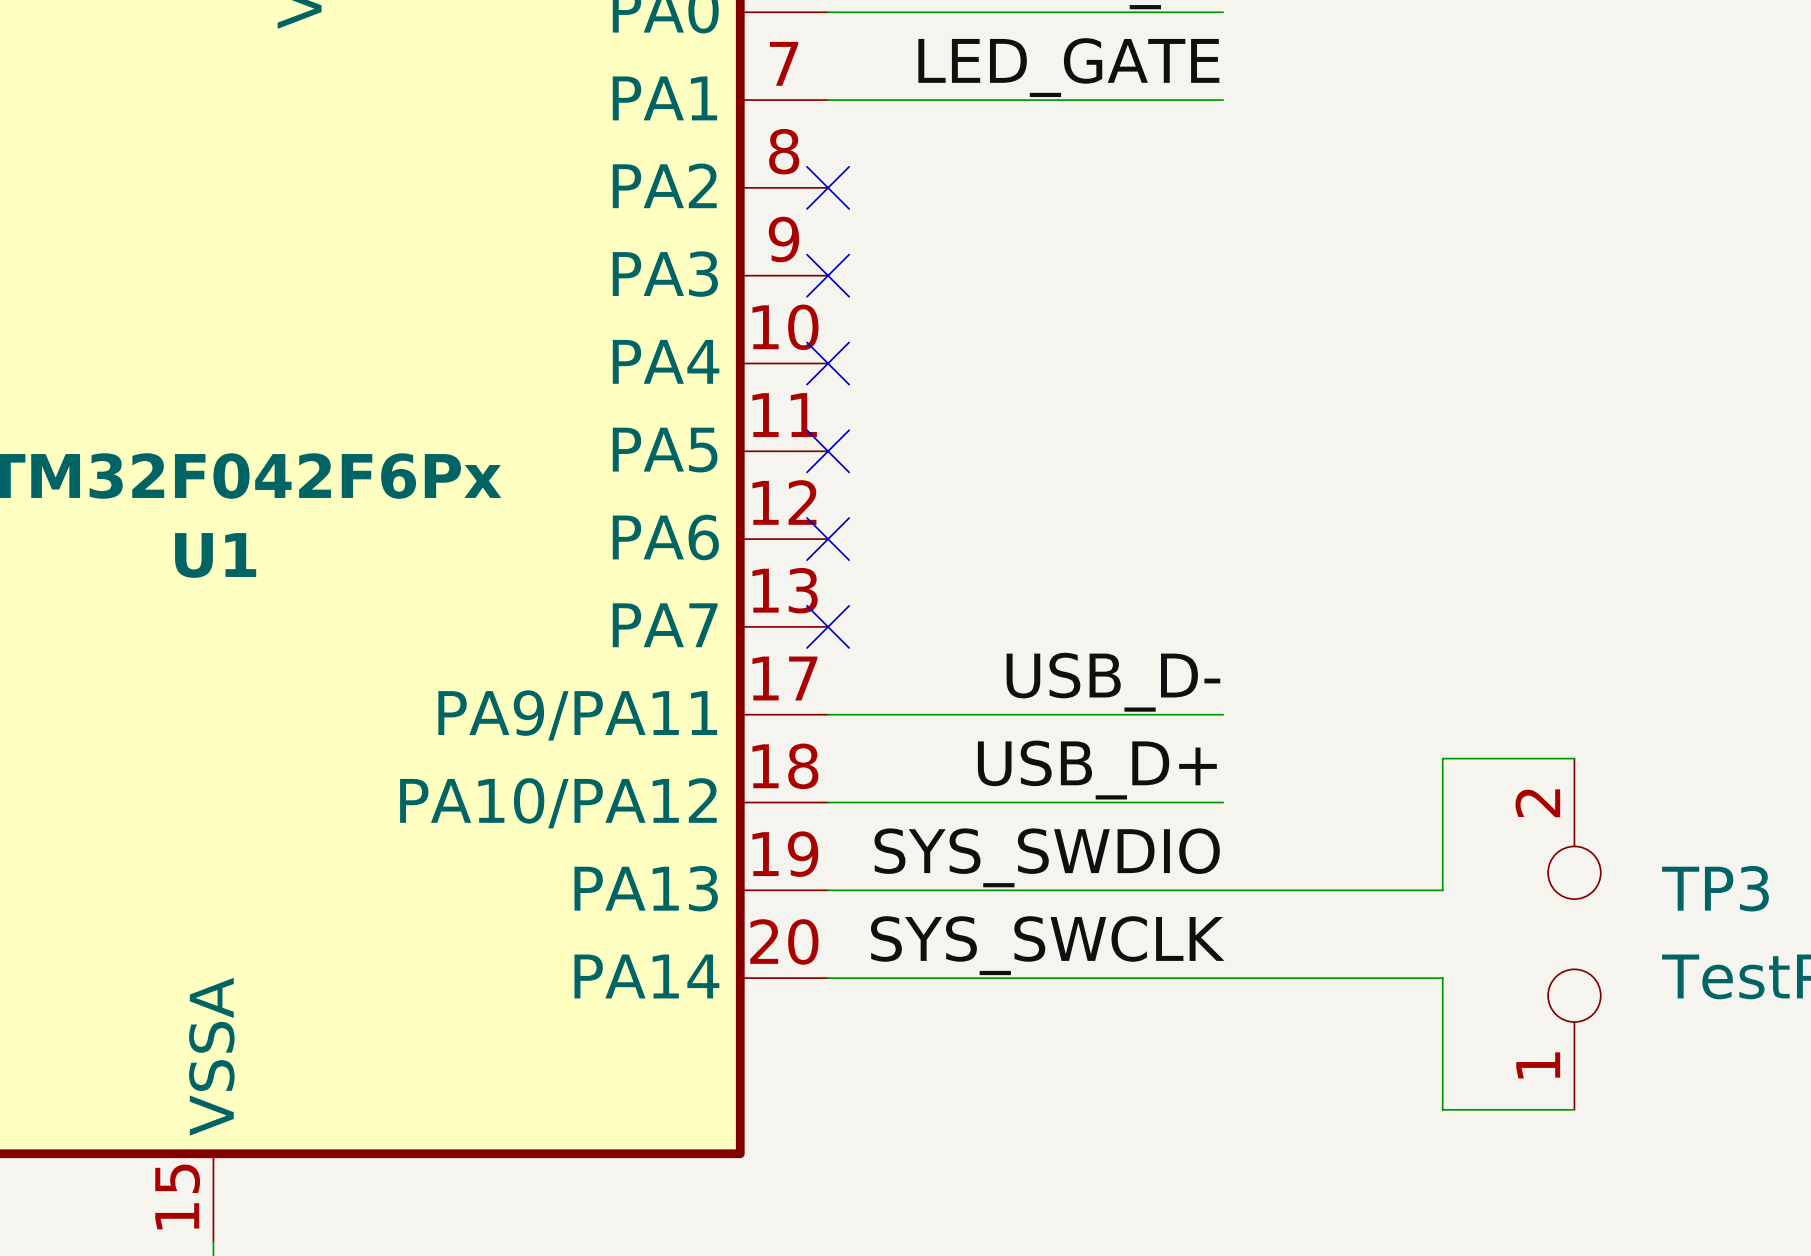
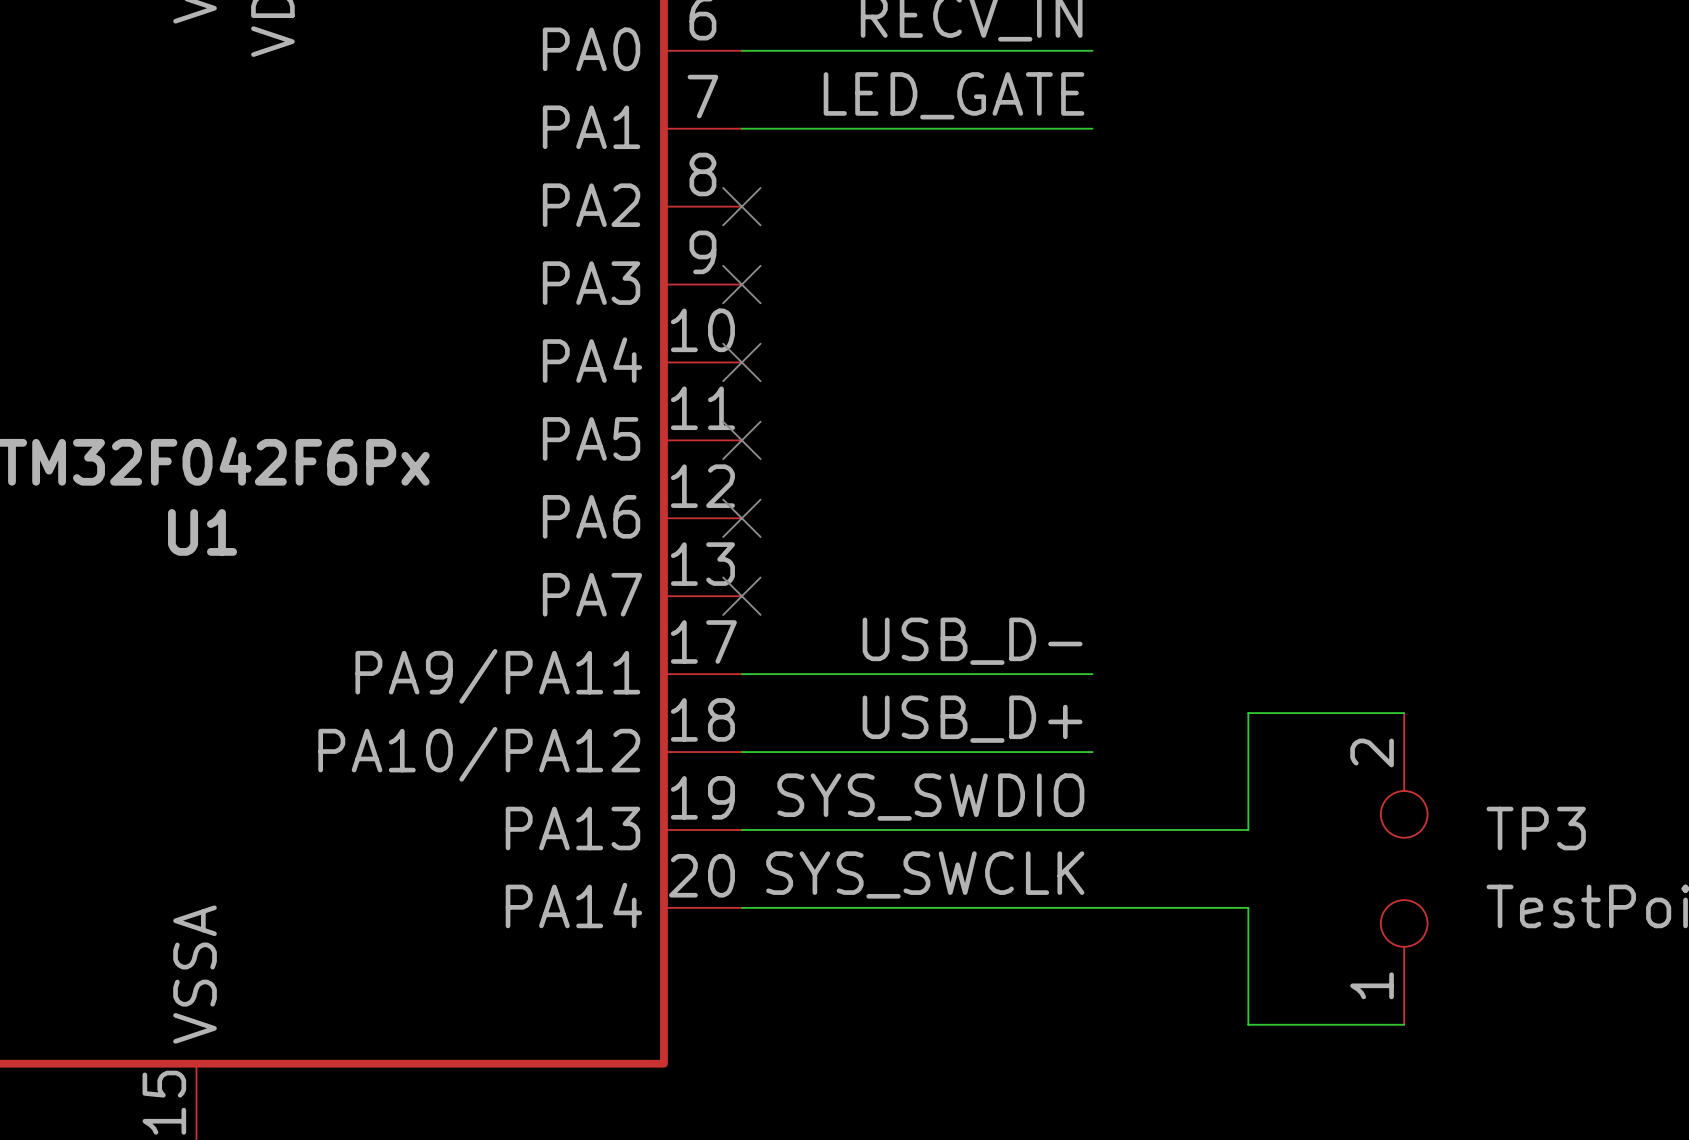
wire: (1442, 758) (1442, 890) (1398, 890) -> (1287, 713) (1248, 713) (1248, 829)
wire: (1398, 978) (1442, 978) (1442, 1109) -> (1248, 907) (1248, 1024) (1287, 1024)

